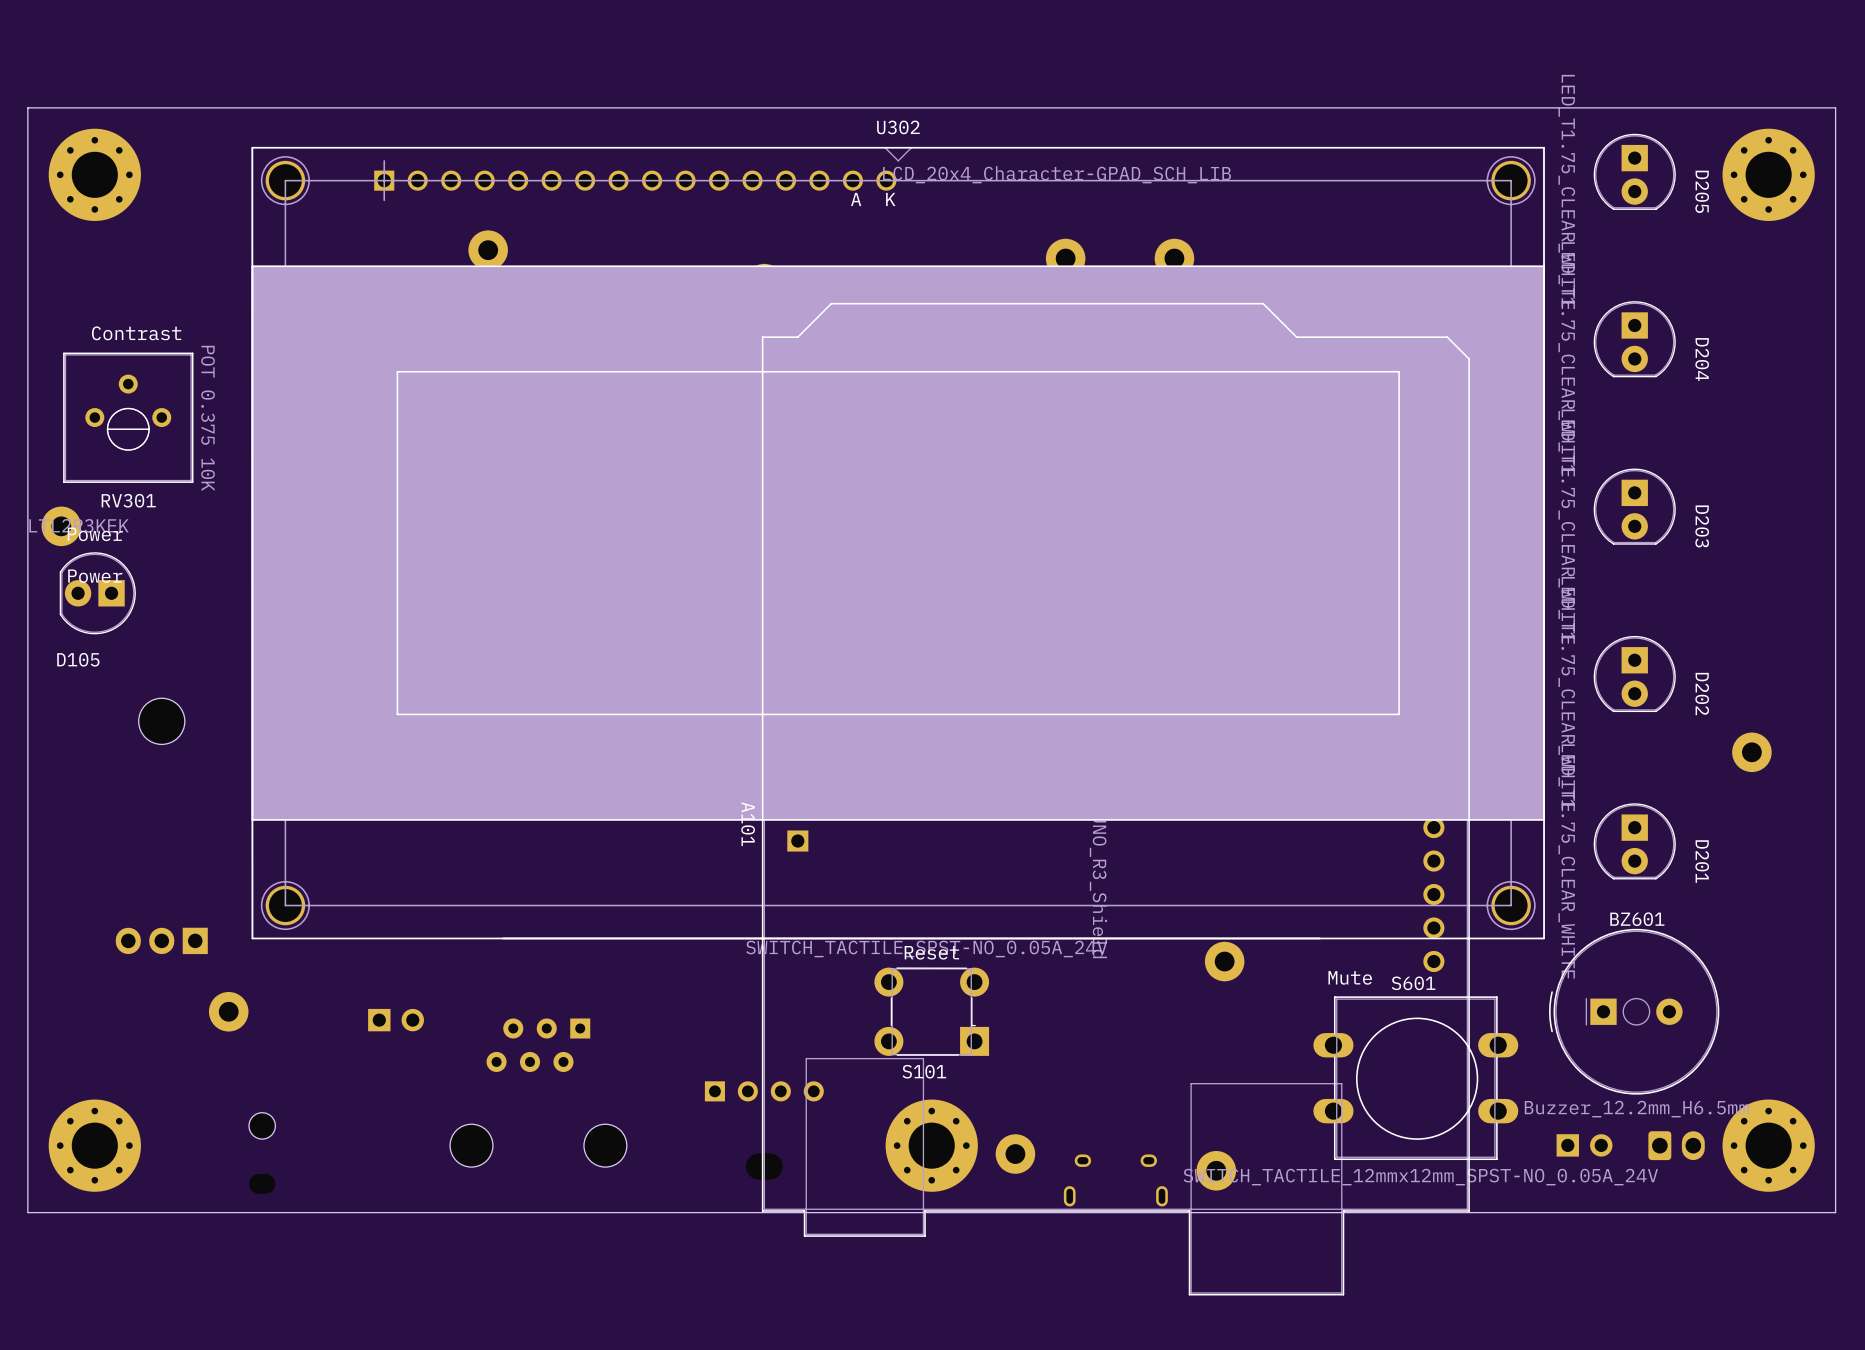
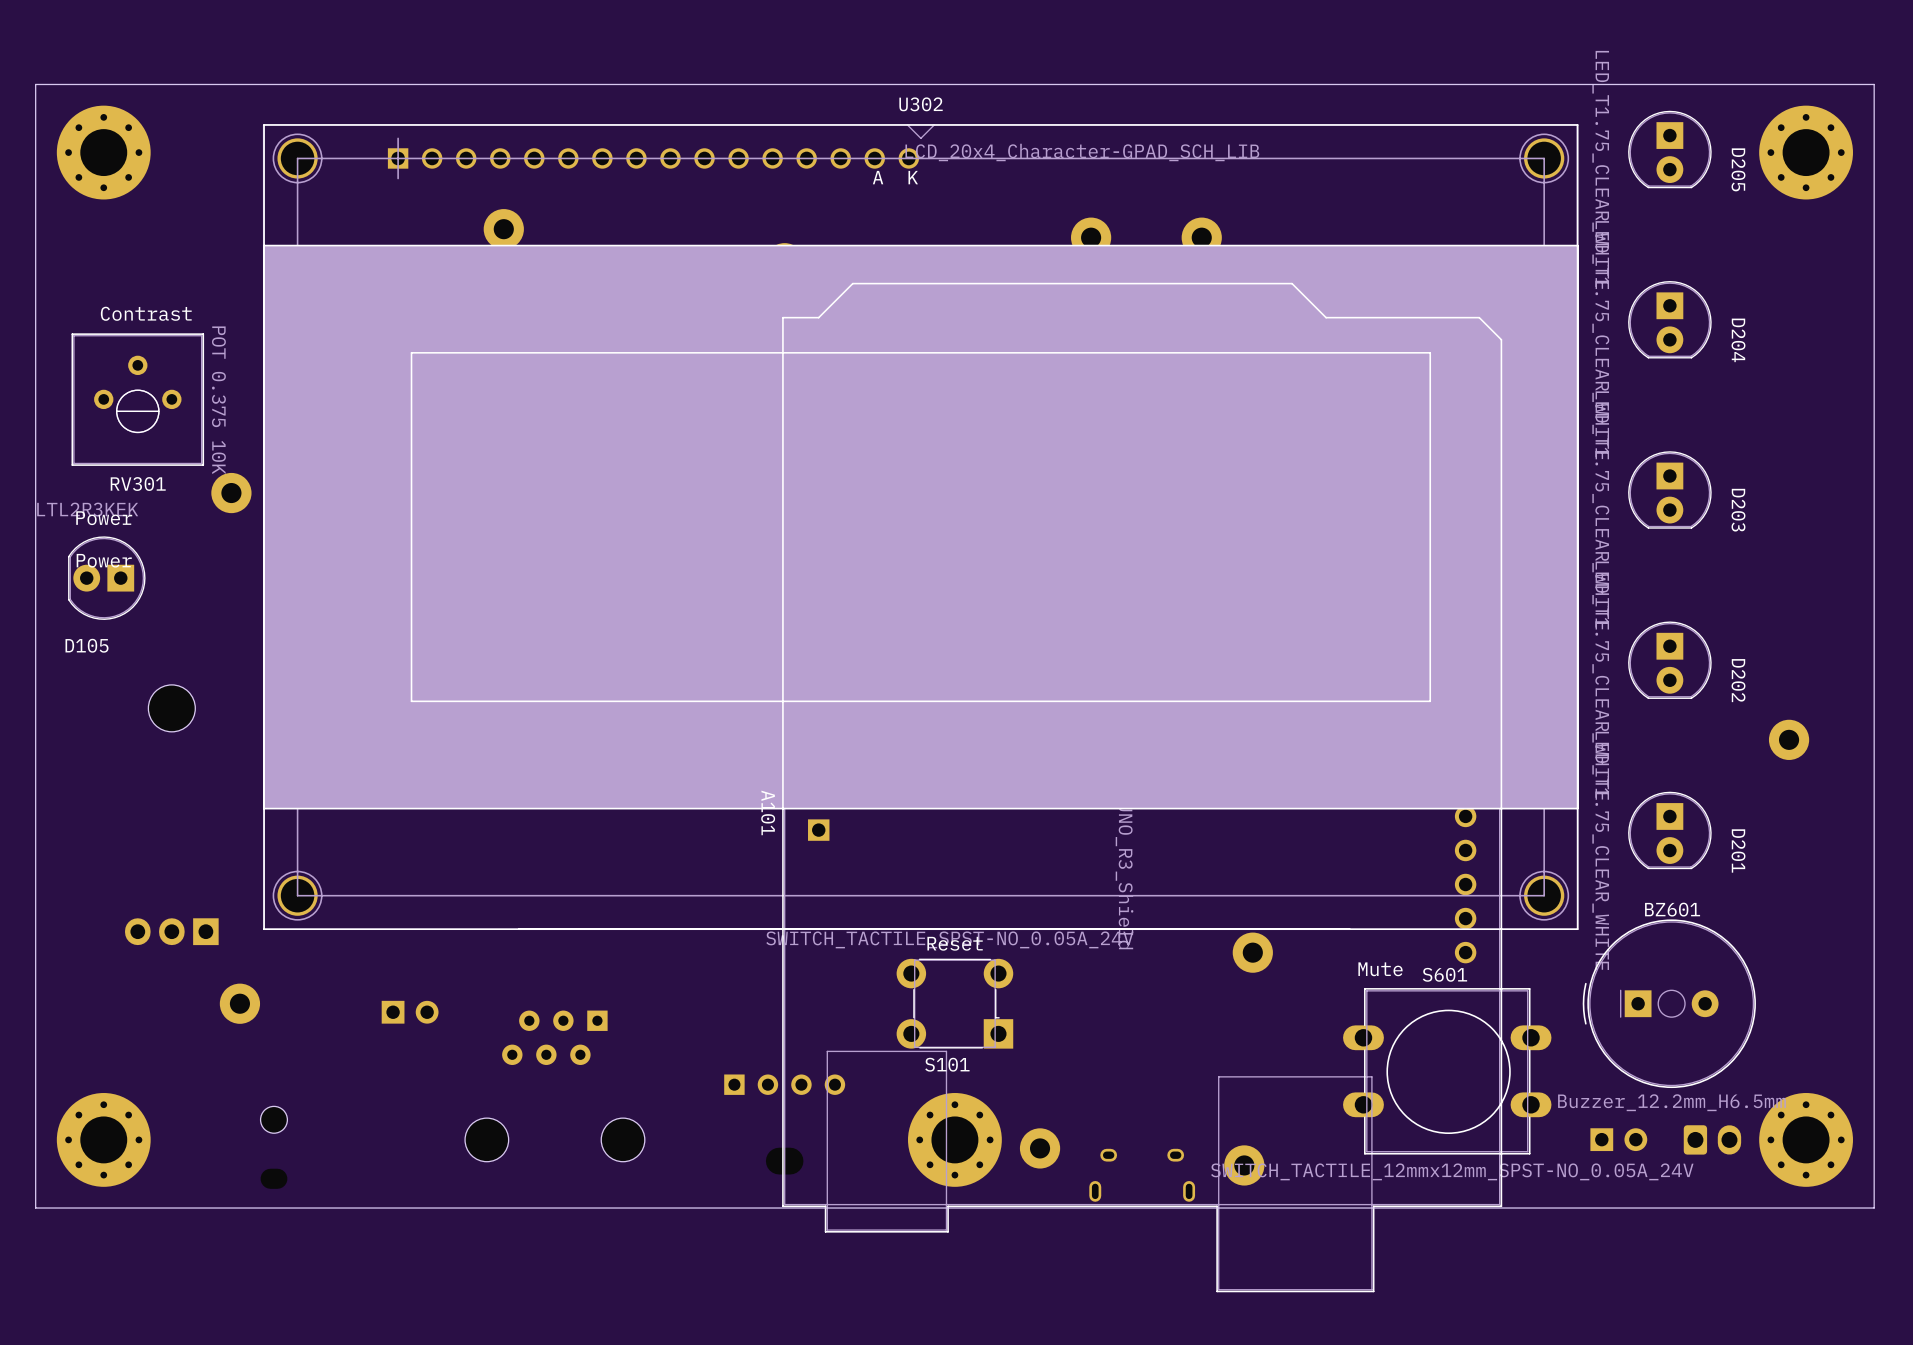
part position: (61, 526) -> (231, 493)

